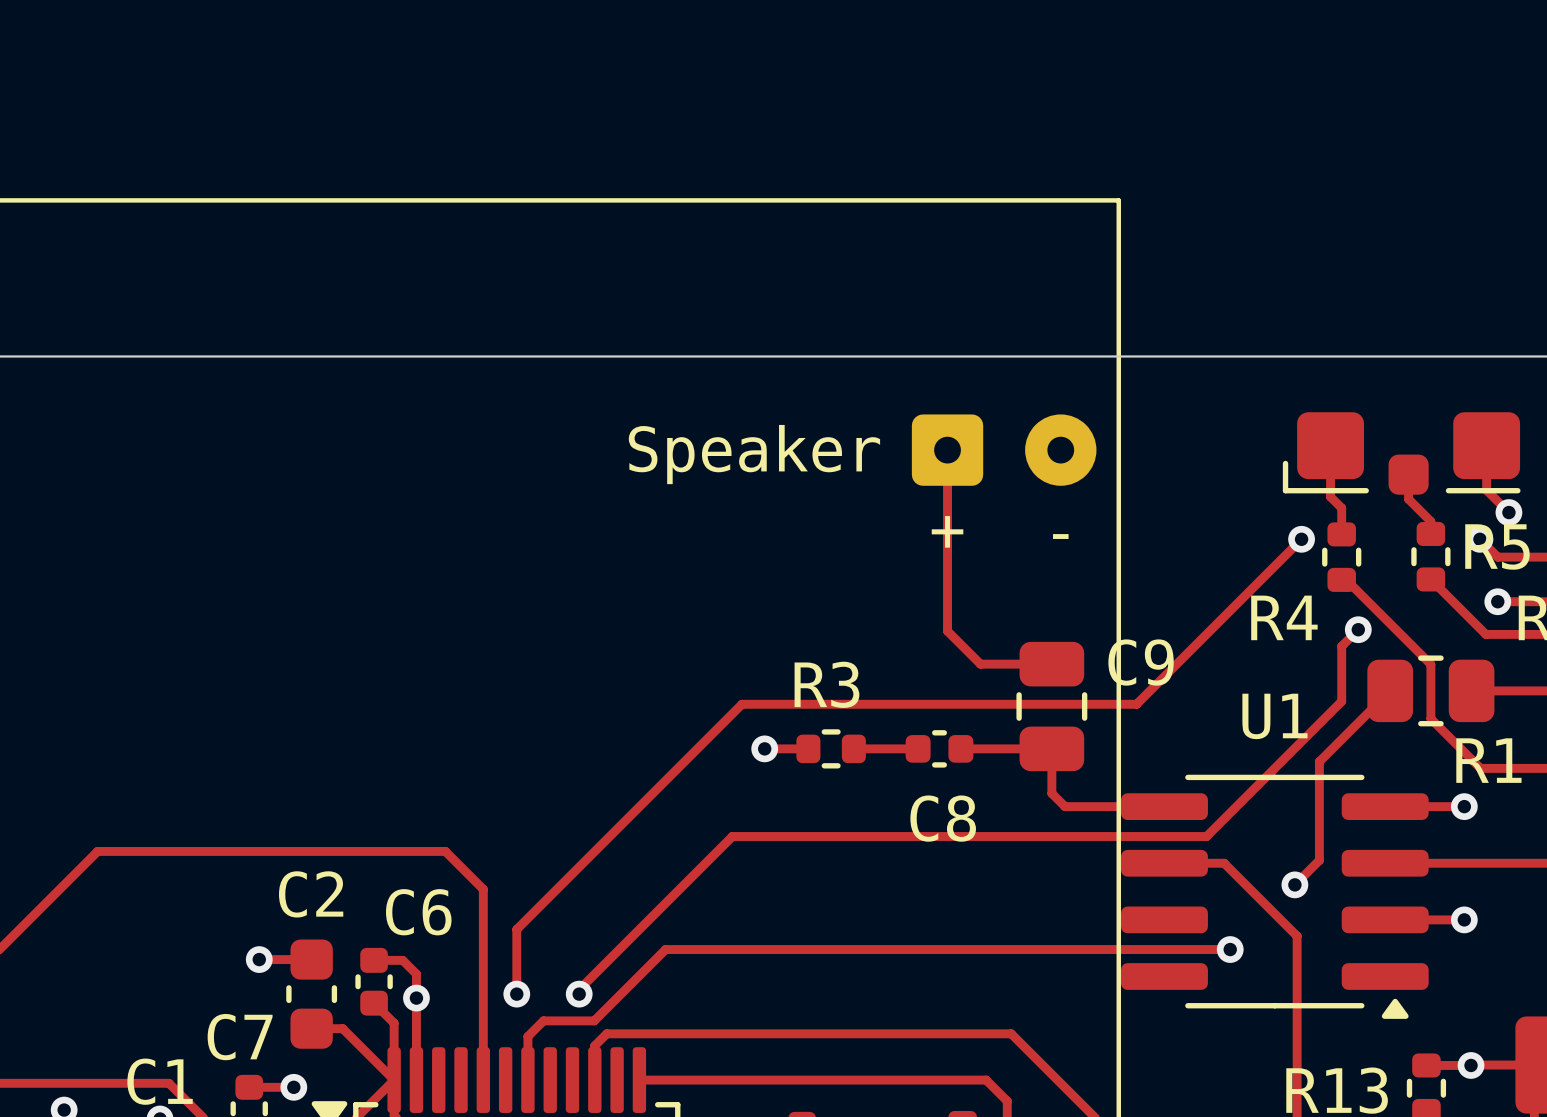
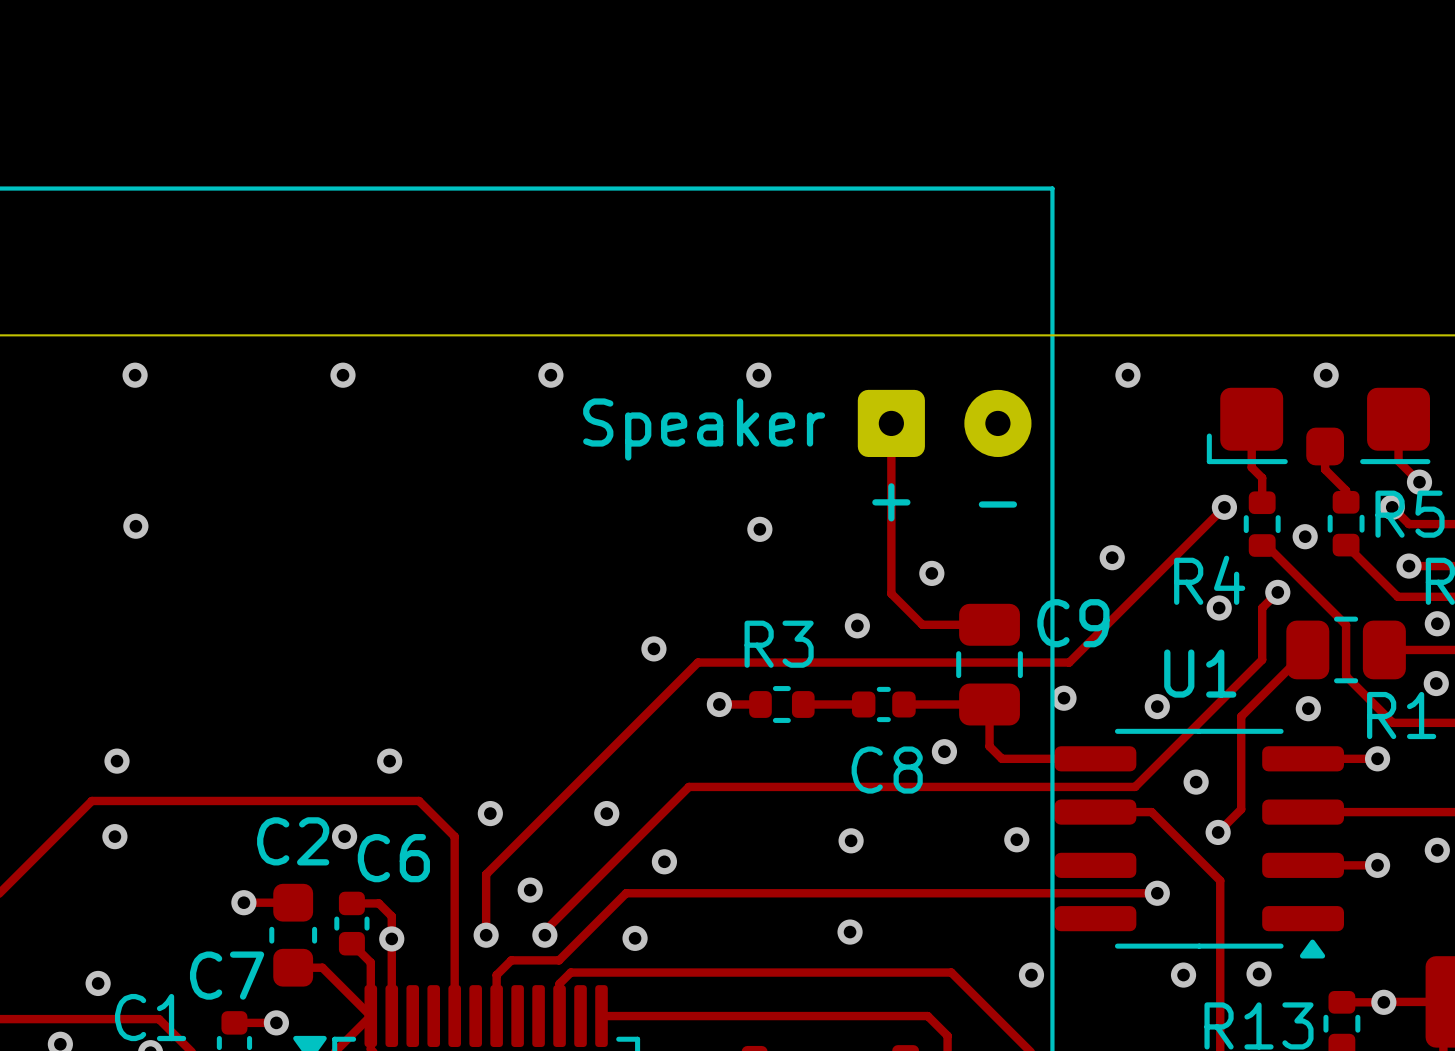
via: none -> (135, 375)
via: none -> (343, 375)
via: none -> (550, 375)
via: none -> (758, 375)
via: none -> (1127, 375)
via: none -> (1326, 375)
via: none -> (135, 526)
via: none -> (759, 529)
via: none -> (1305, 536)
via: none -> (1112, 557)
via: none -> (931, 573)
via: none -> (1219, 608)
via: none -> (1437, 623)
via: none -> (857, 625)
via: none -> (653, 648)
via: none -> (1436, 683)
via: none -> (1063, 698)
via: none -> (1157, 706)
via: none -> (1308, 708)
via: none -> (944, 751)
via: none -> (117, 761)
via: none -> (389, 761)
via: none -> (1196, 782)
via: none -> (490, 813)
via: none -> (606, 813)
via: none -> (114, 836)
via: none -> (344, 836)
via: none -> (1016, 839)
via: none -> (851, 840)
via: none -> (1437, 850)
via: none -> (664, 861)
via: none -> (530, 890)
via: none -> (850, 932)
via: none -> (635, 938)
via: none -> (1259, 974)
via: none -> (1031, 975)
via: none -> (1183, 975)
via: none -> (98, 983)

